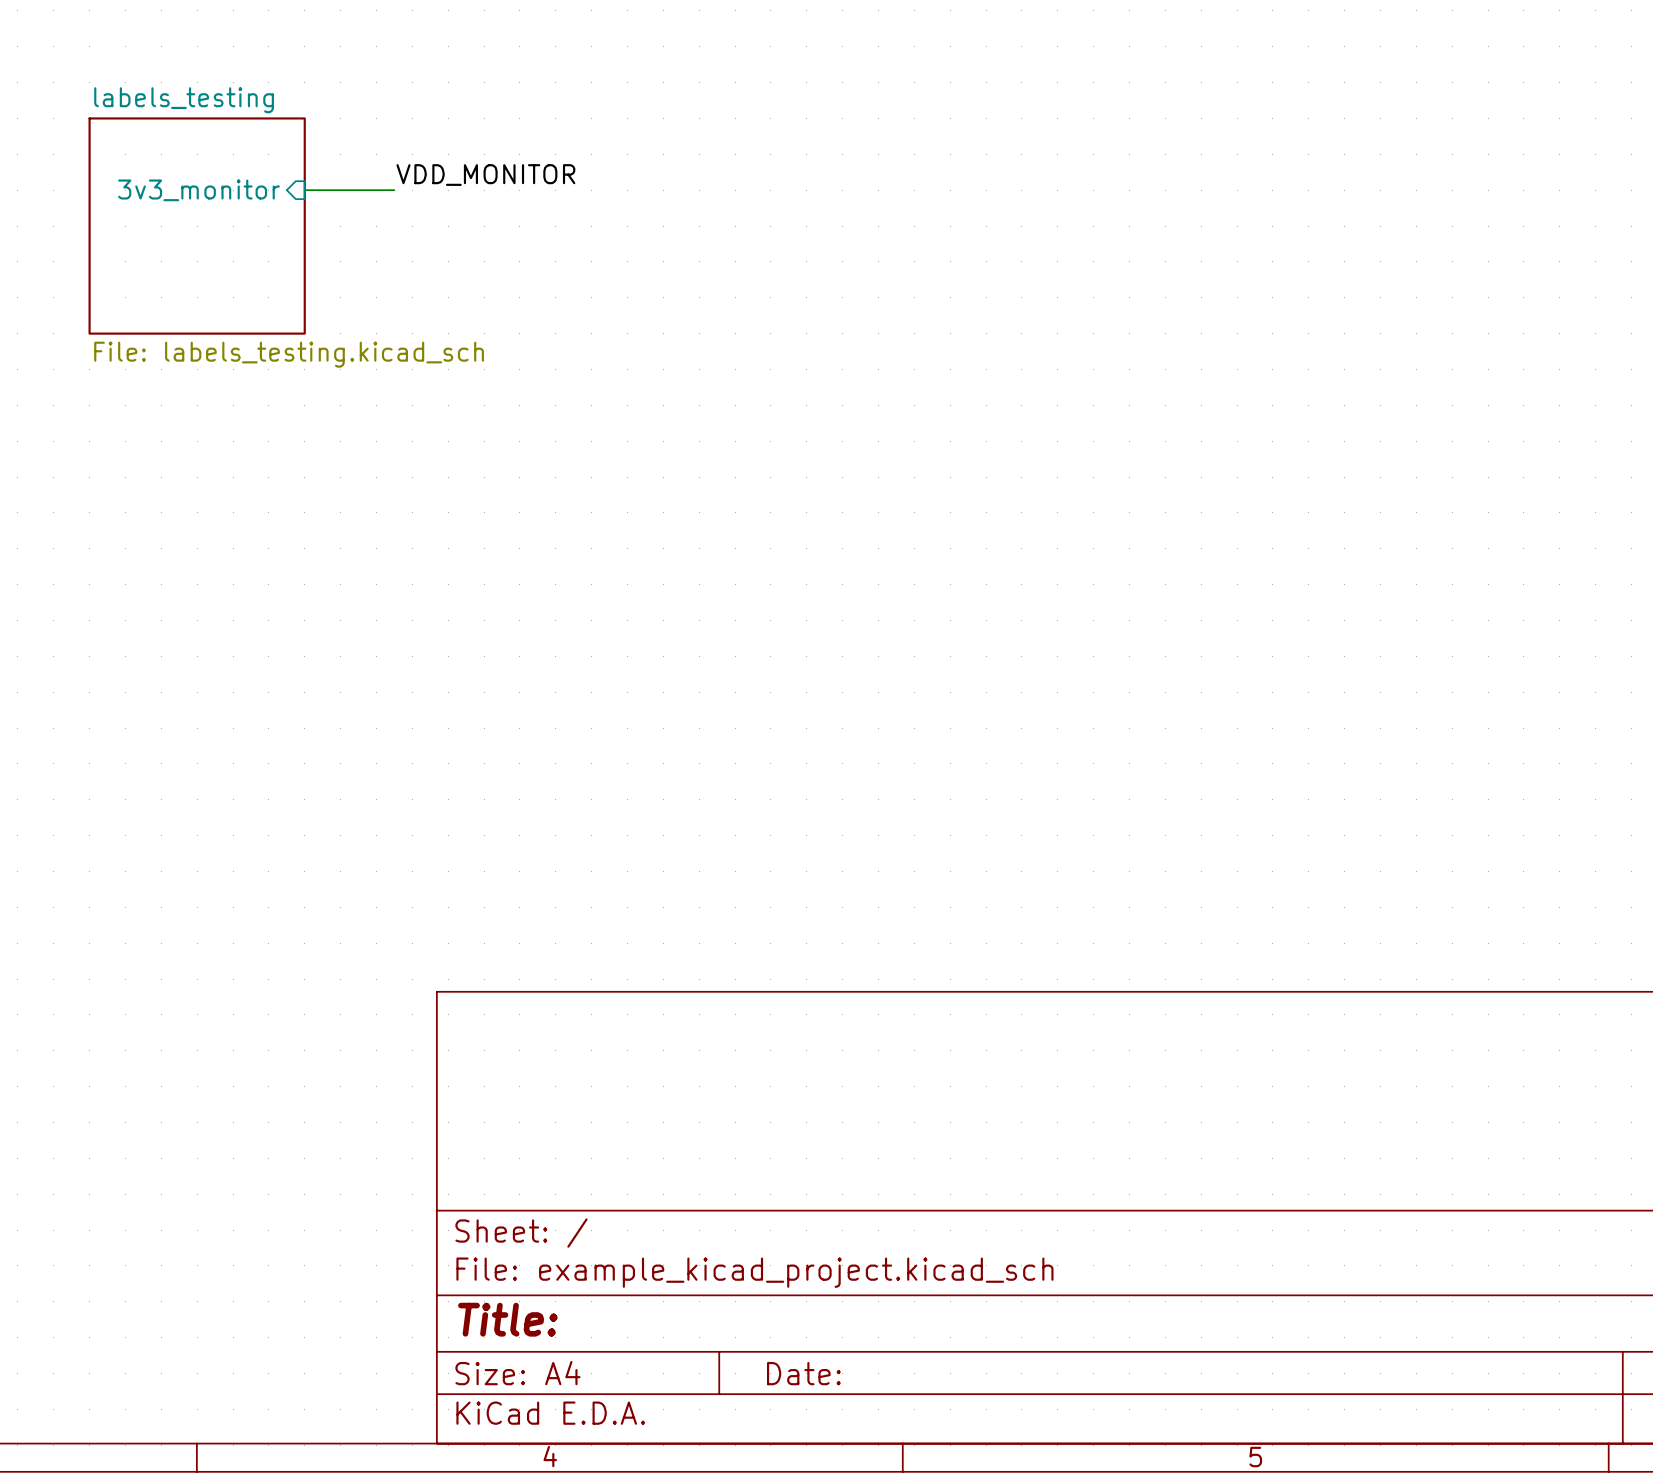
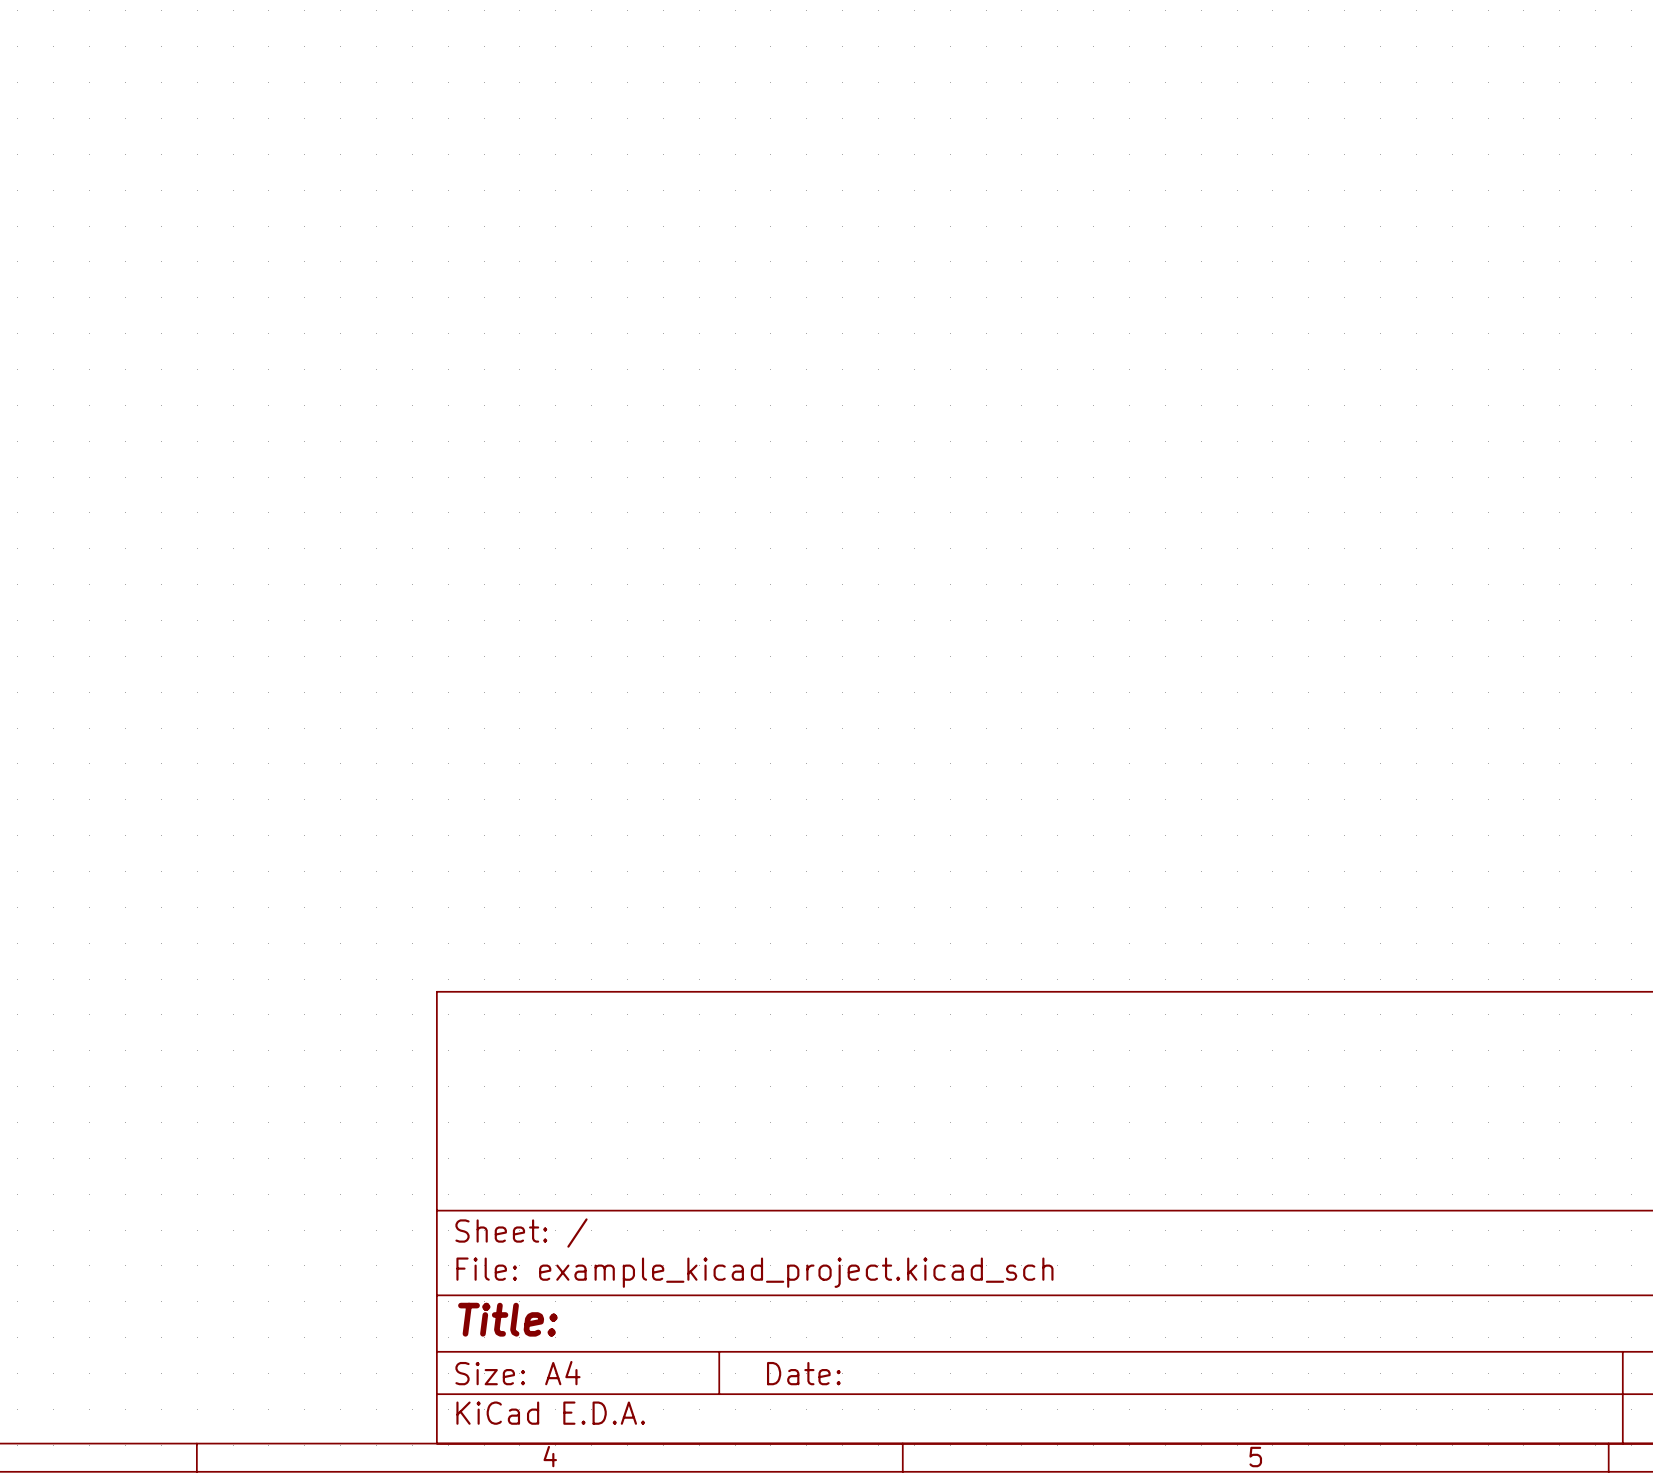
label: VDD_MONITOR (485, 175) -> none
sheet pin: 3v3_monitor (199, 190) -> none
wire: (304, 190) (394, 190) -> none
sheet labels_testing: File: labels_testing.kicad_sch (197, 226) -> none

